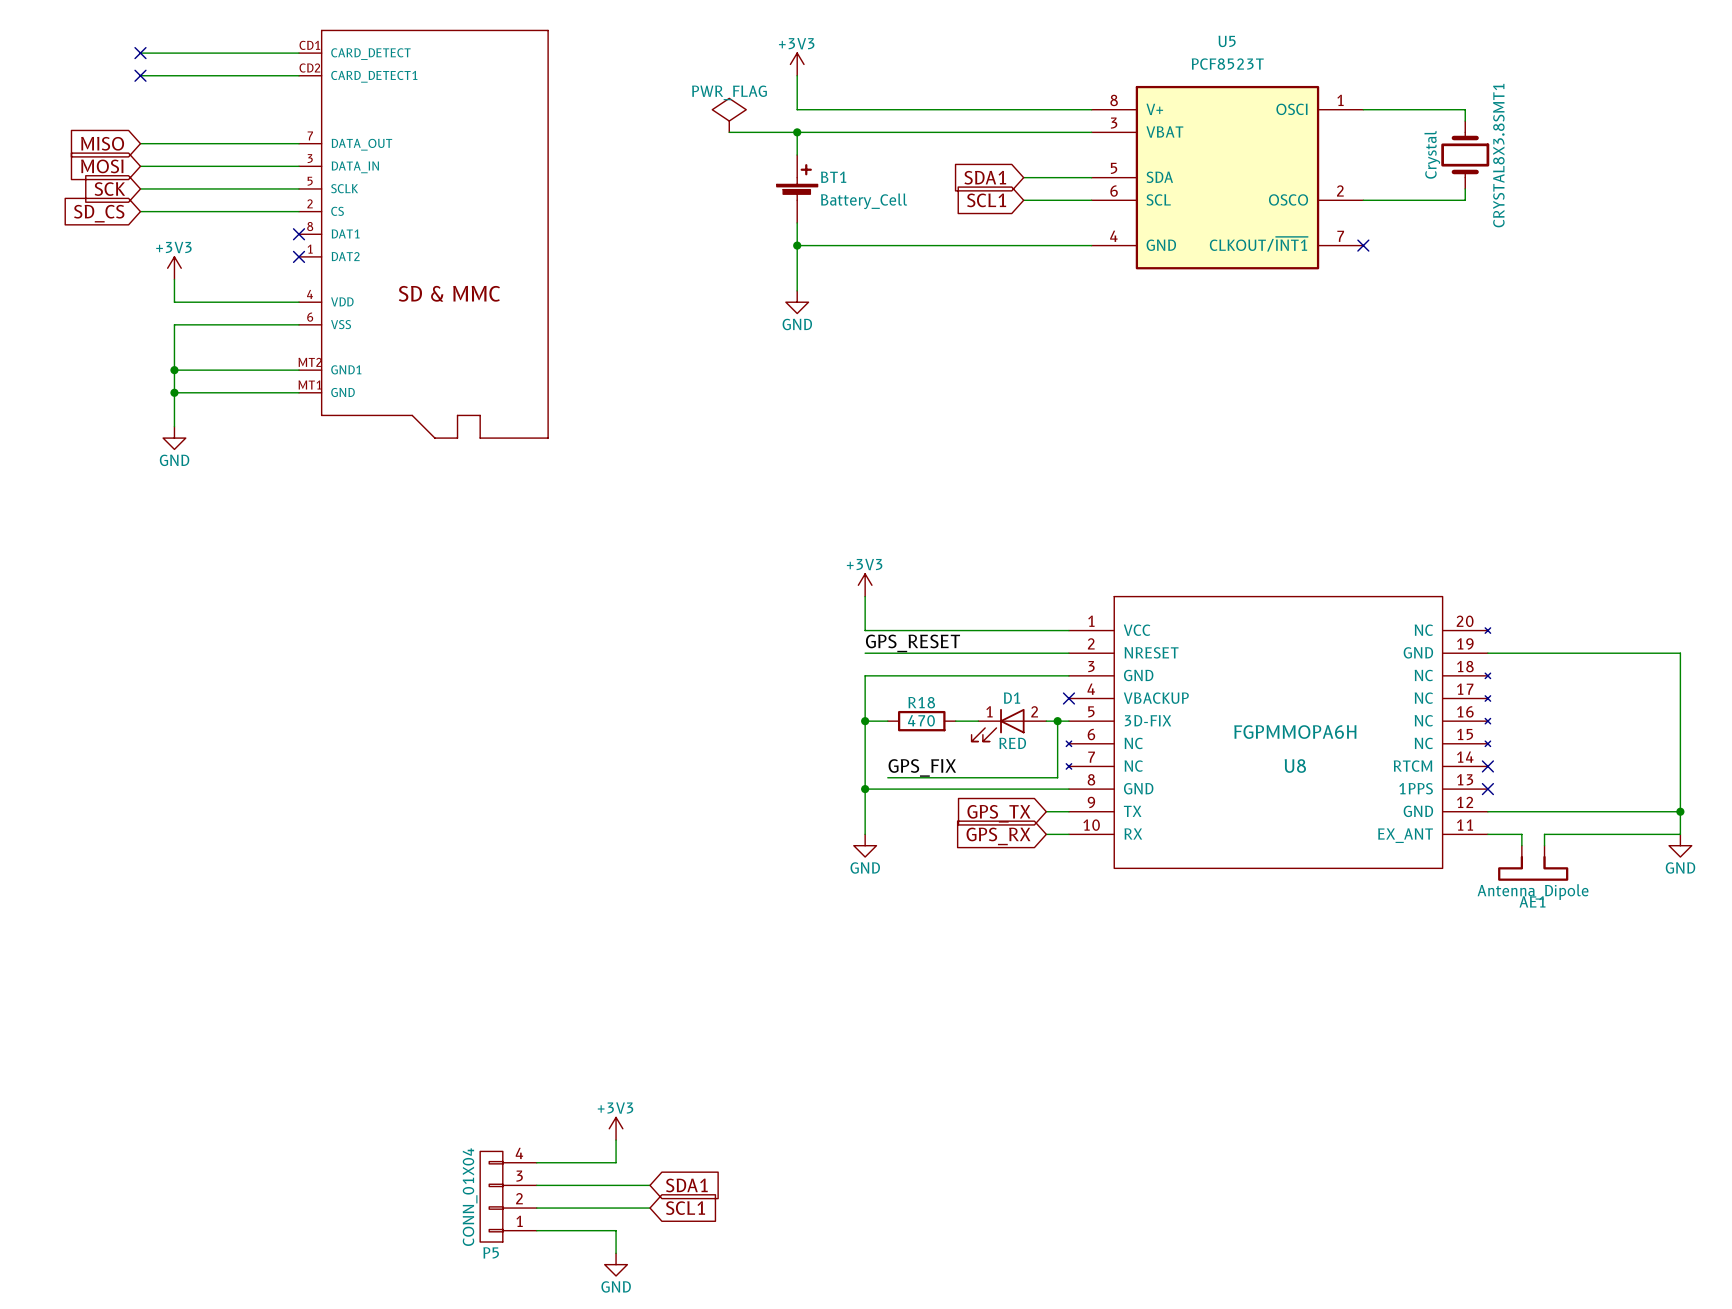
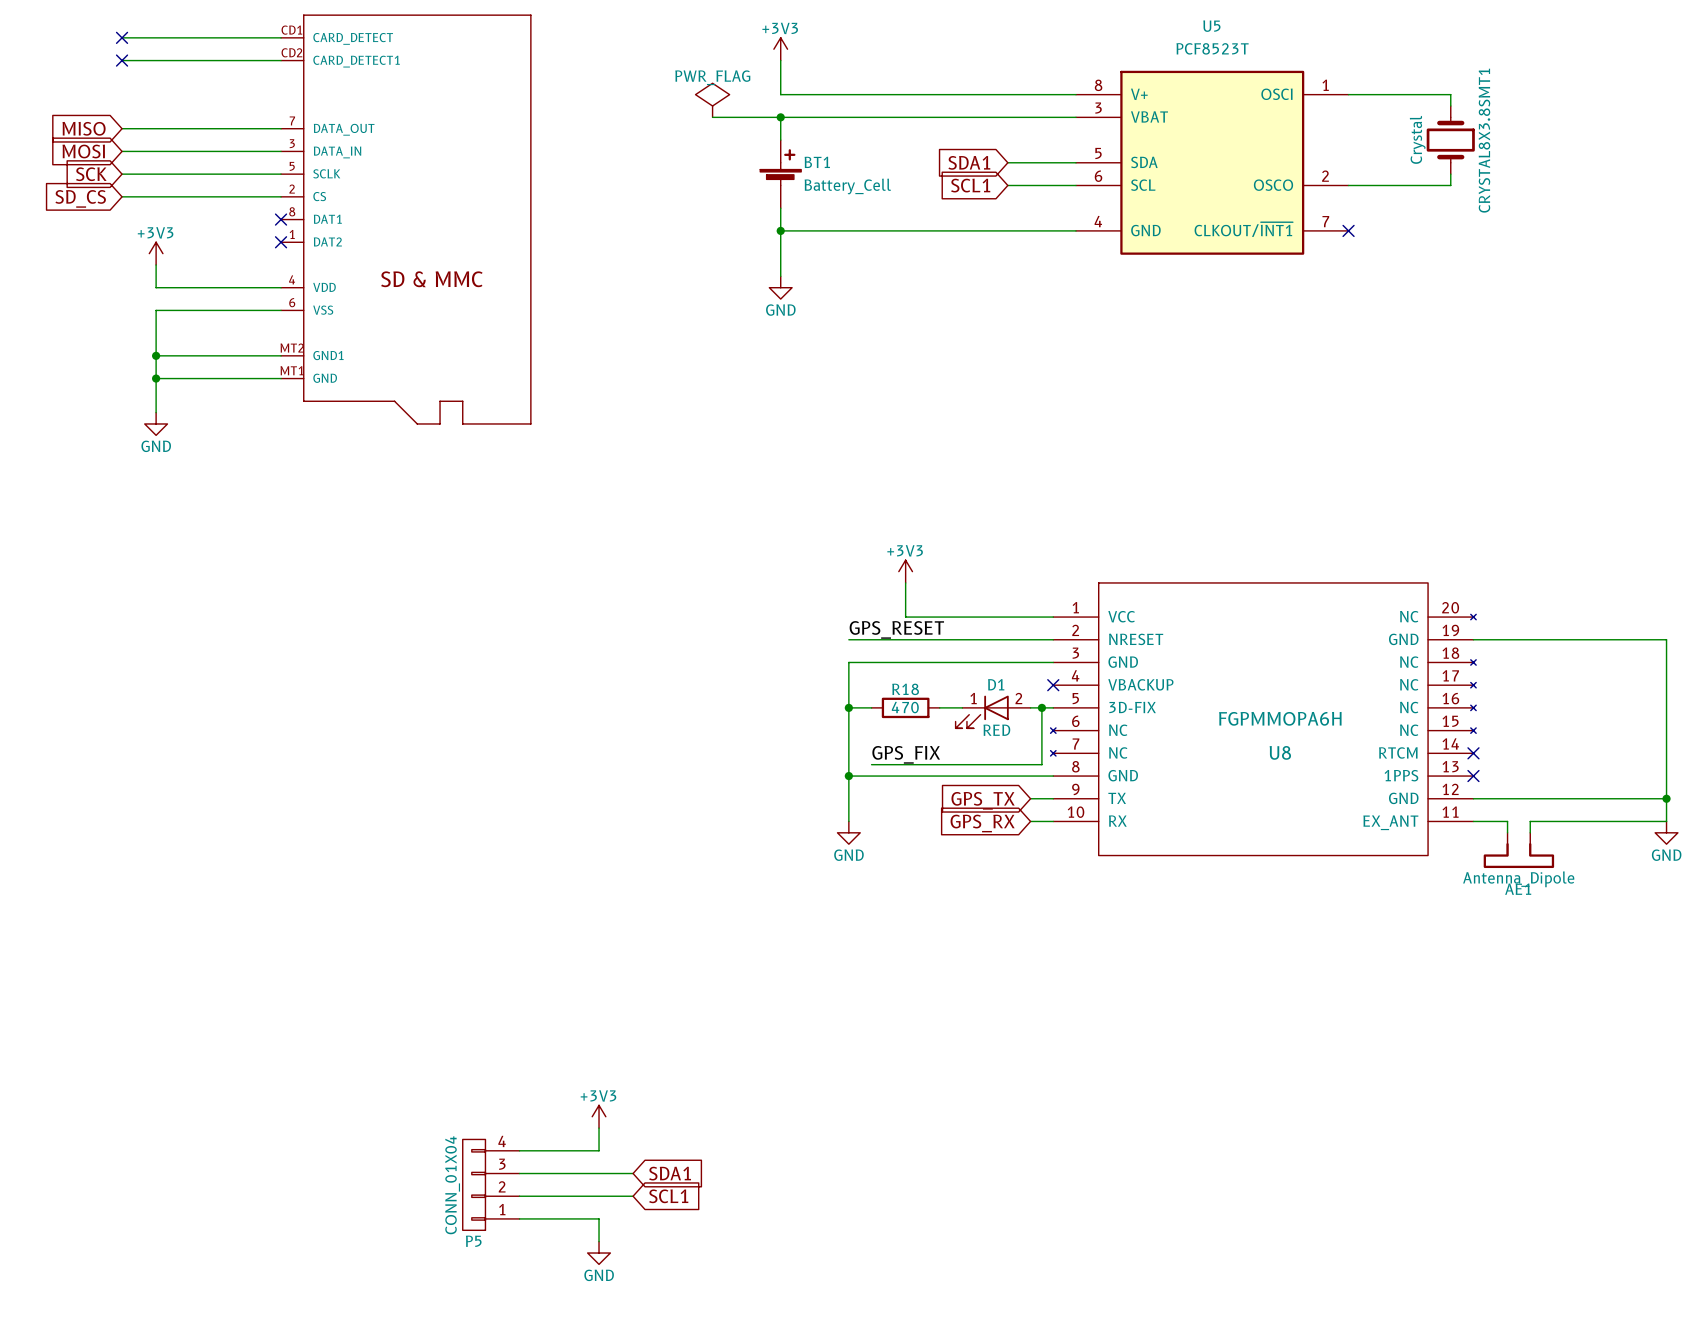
power symbol position: +3V3 (865, 585) -> +3V3 (905, 571)
wire: (865, 596) (865, 630) (921, 630) -> (905, 582) (905, 617)

